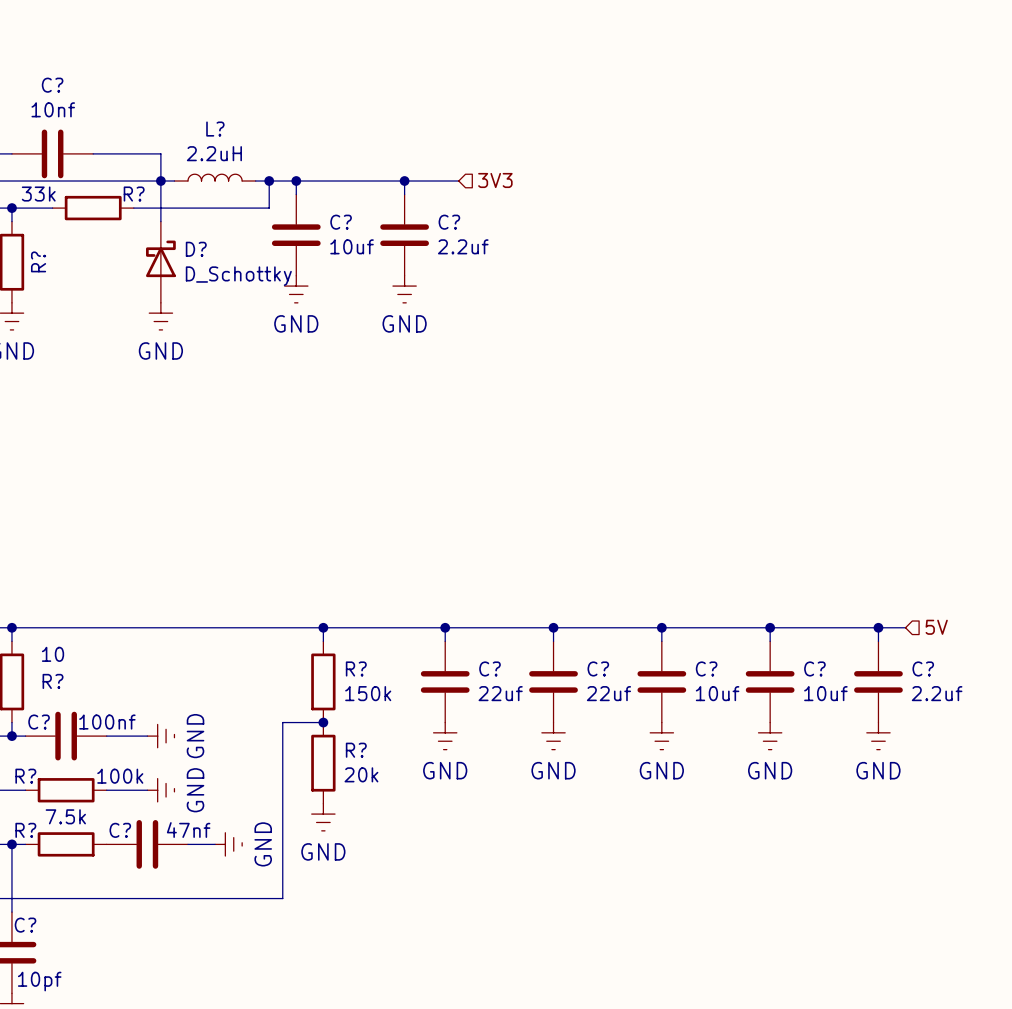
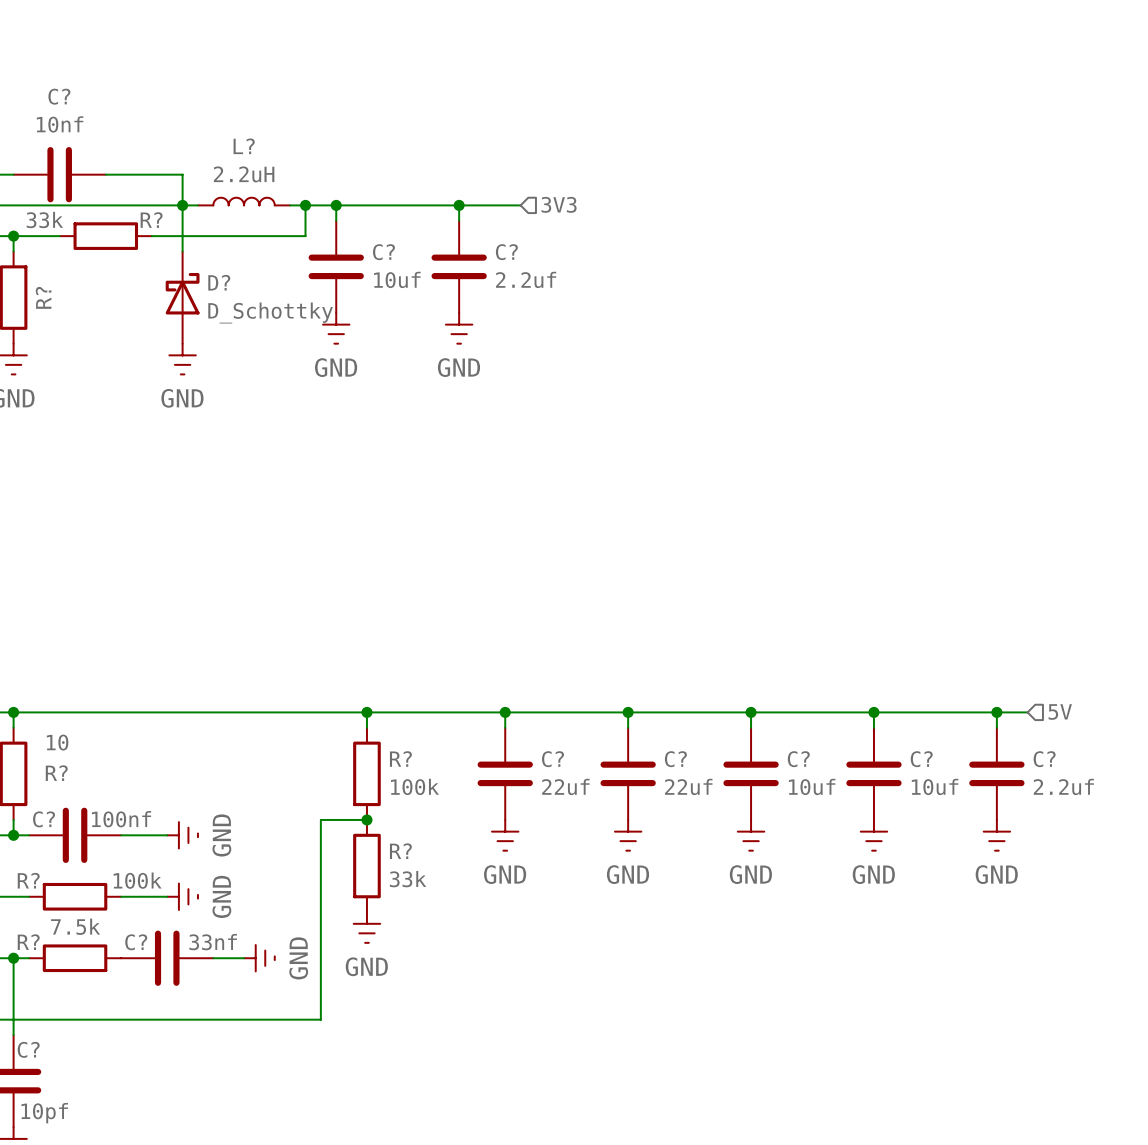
R? value: 150k (368, 693) -> 100k (414, 786)
R? value: 20k (361, 774) -> 33k (408, 879)
C? value: 47nf (188, 830) -> 33nf (213, 942)

